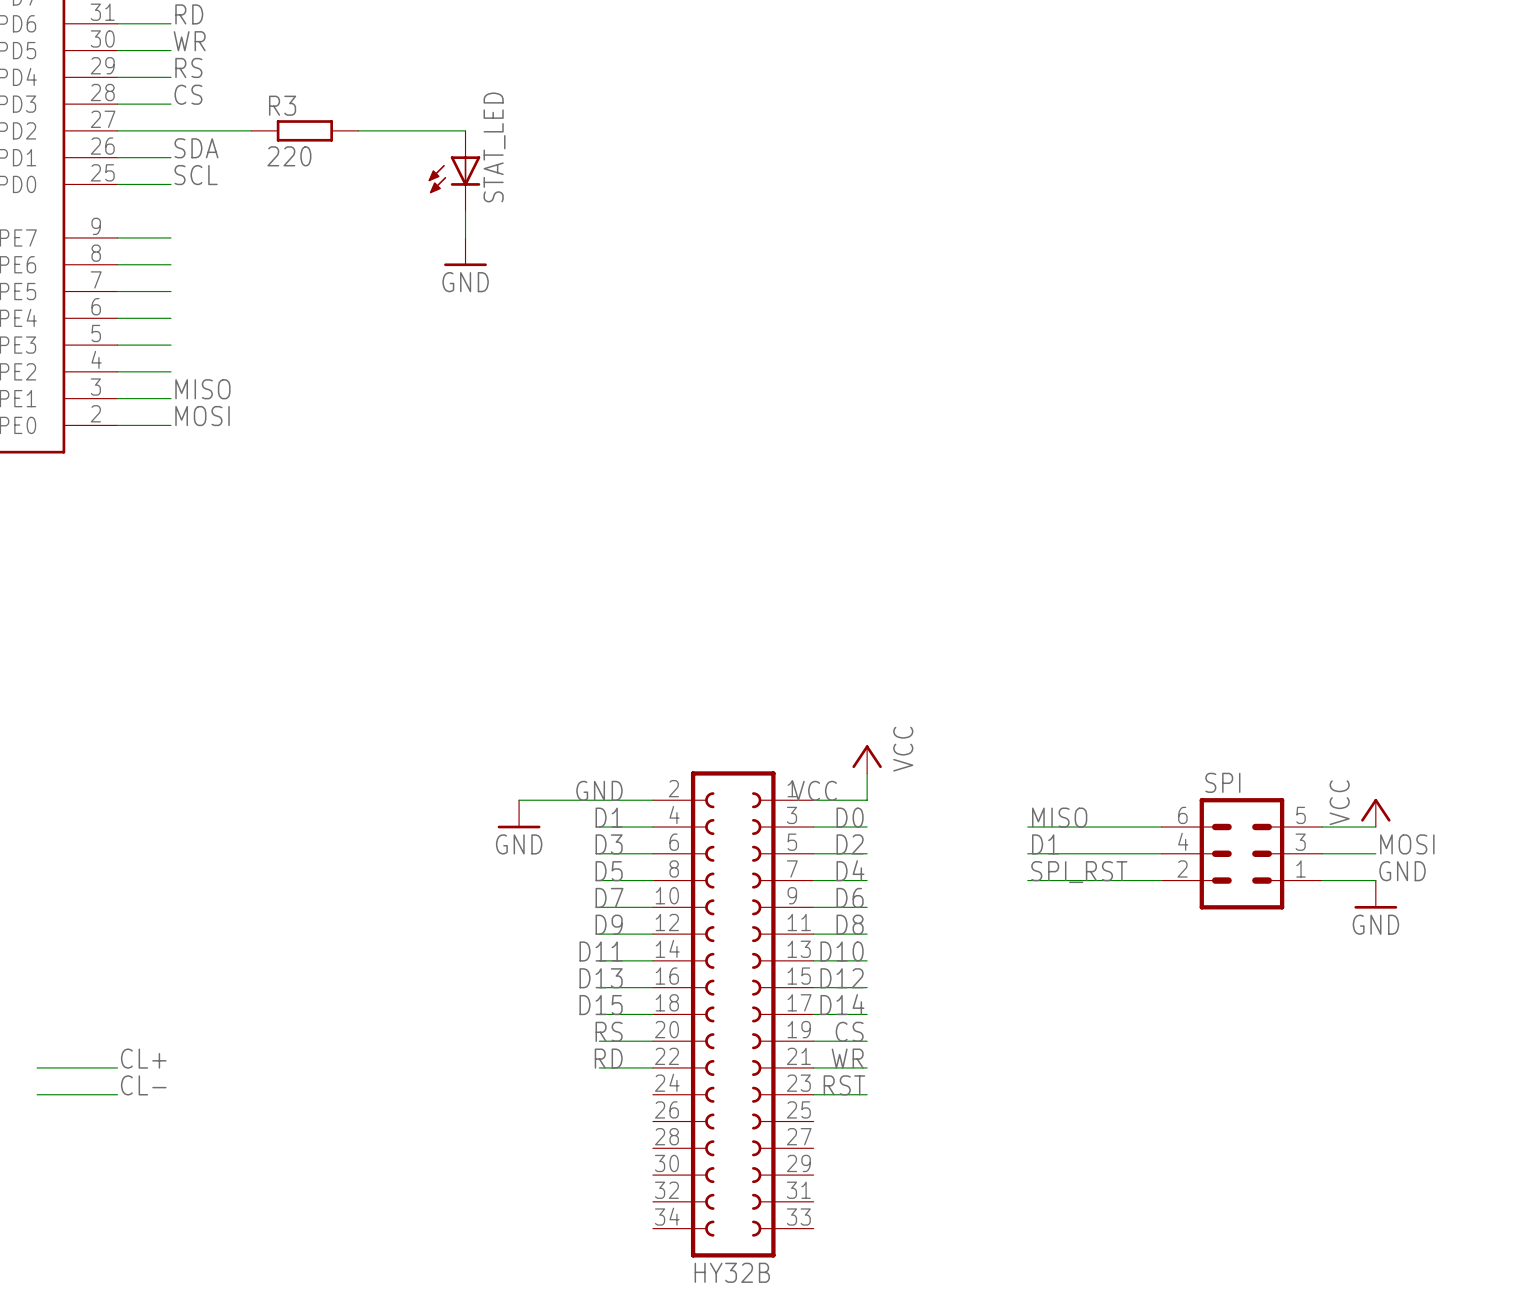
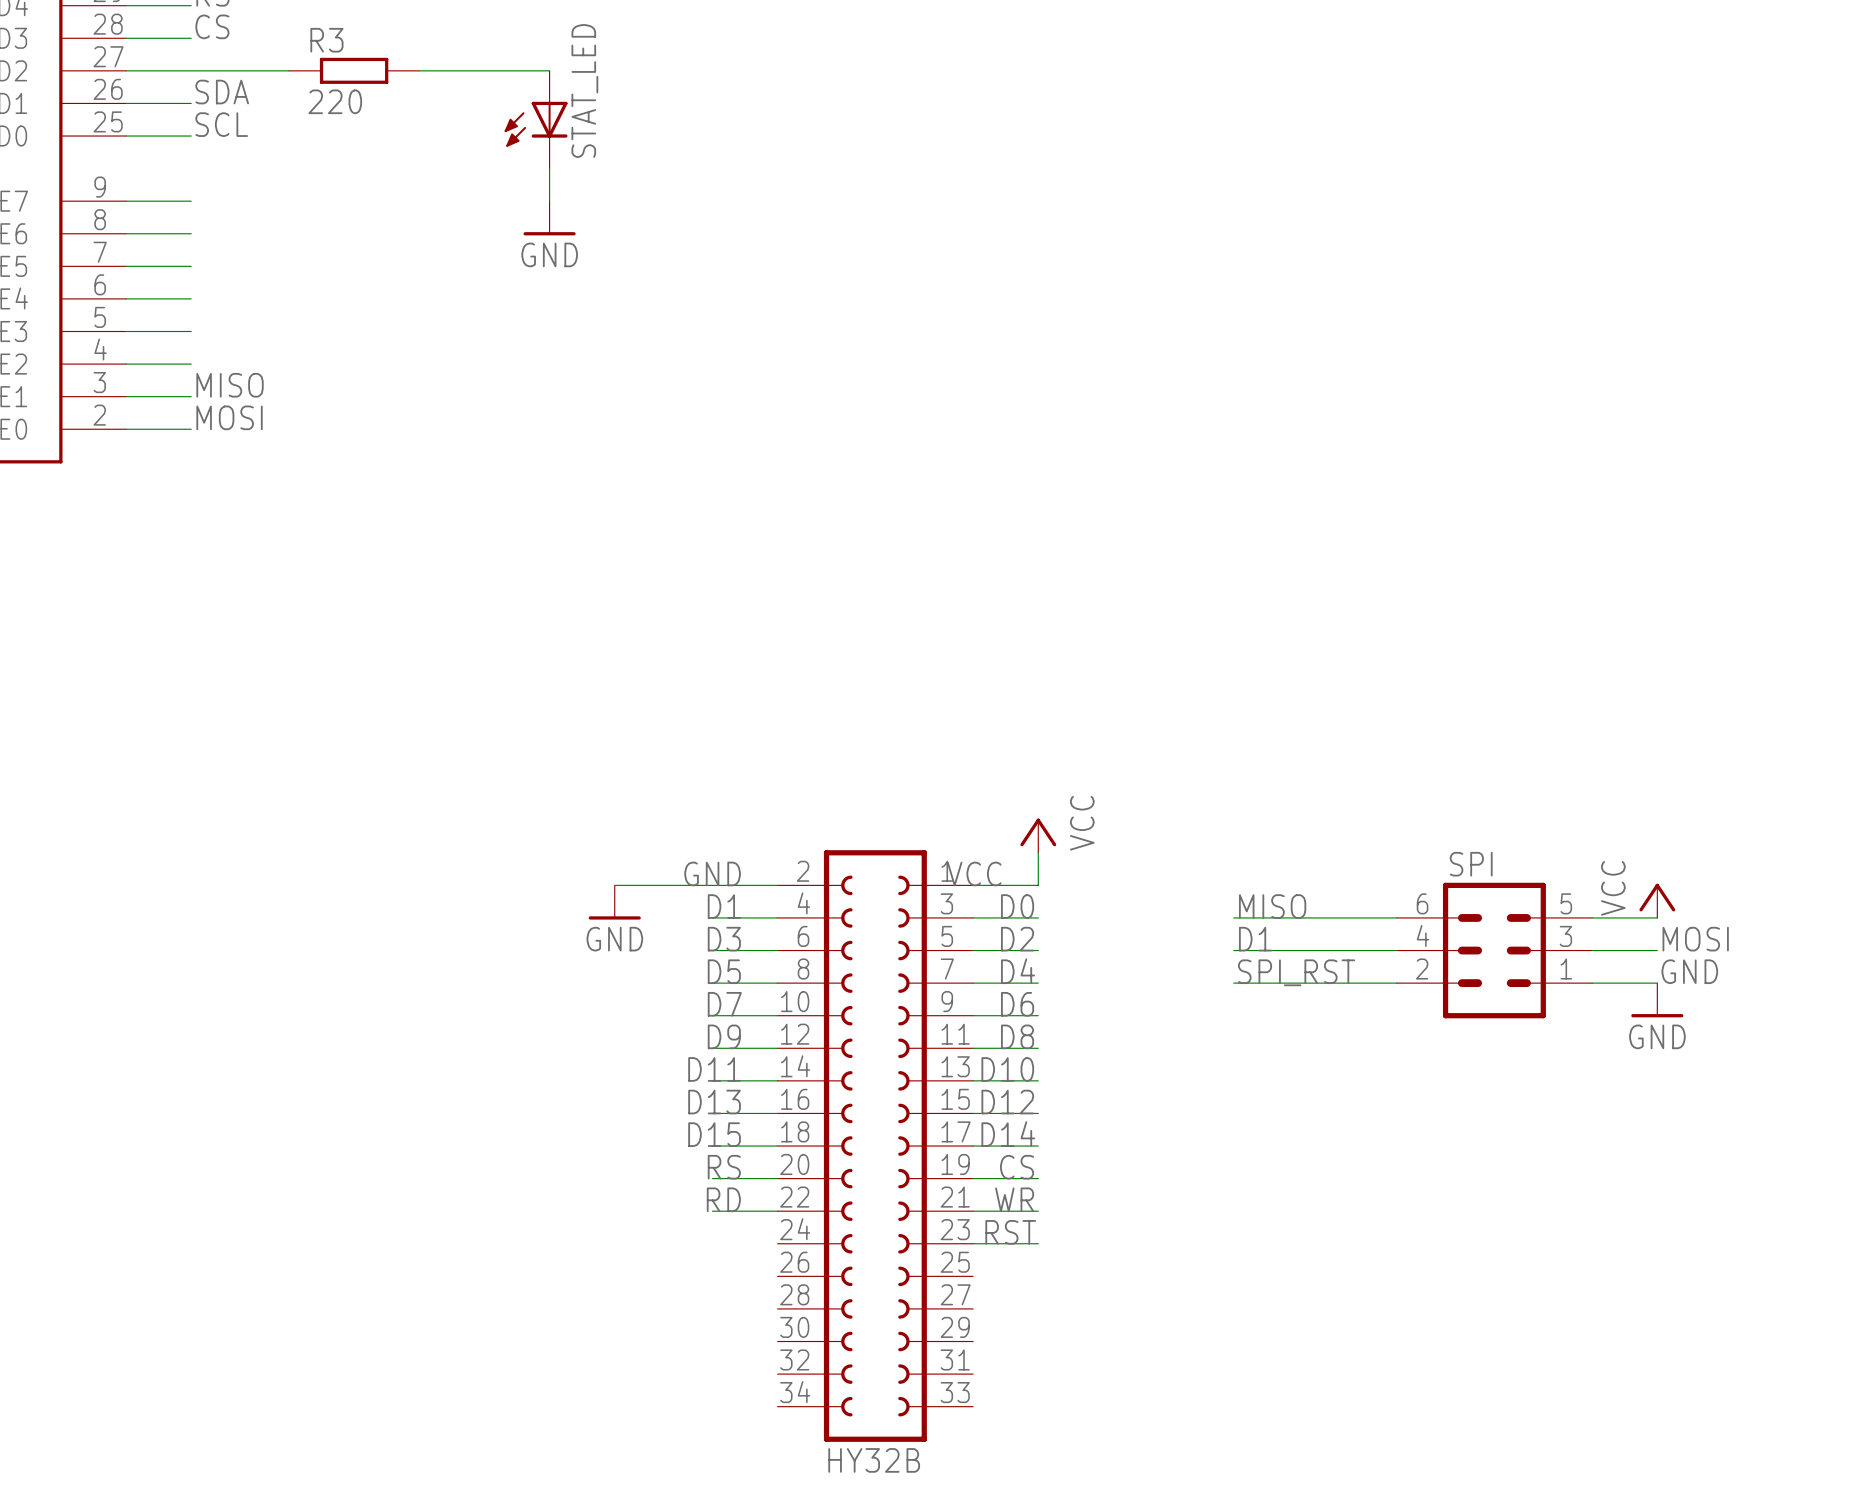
label: CL+ (143, 1058) -> none
wire: (37, 1067) (117, 1067) -> none
label: CL- (143, 1085) -> none
wire: (37, 1094) (117, 1094) -> none

